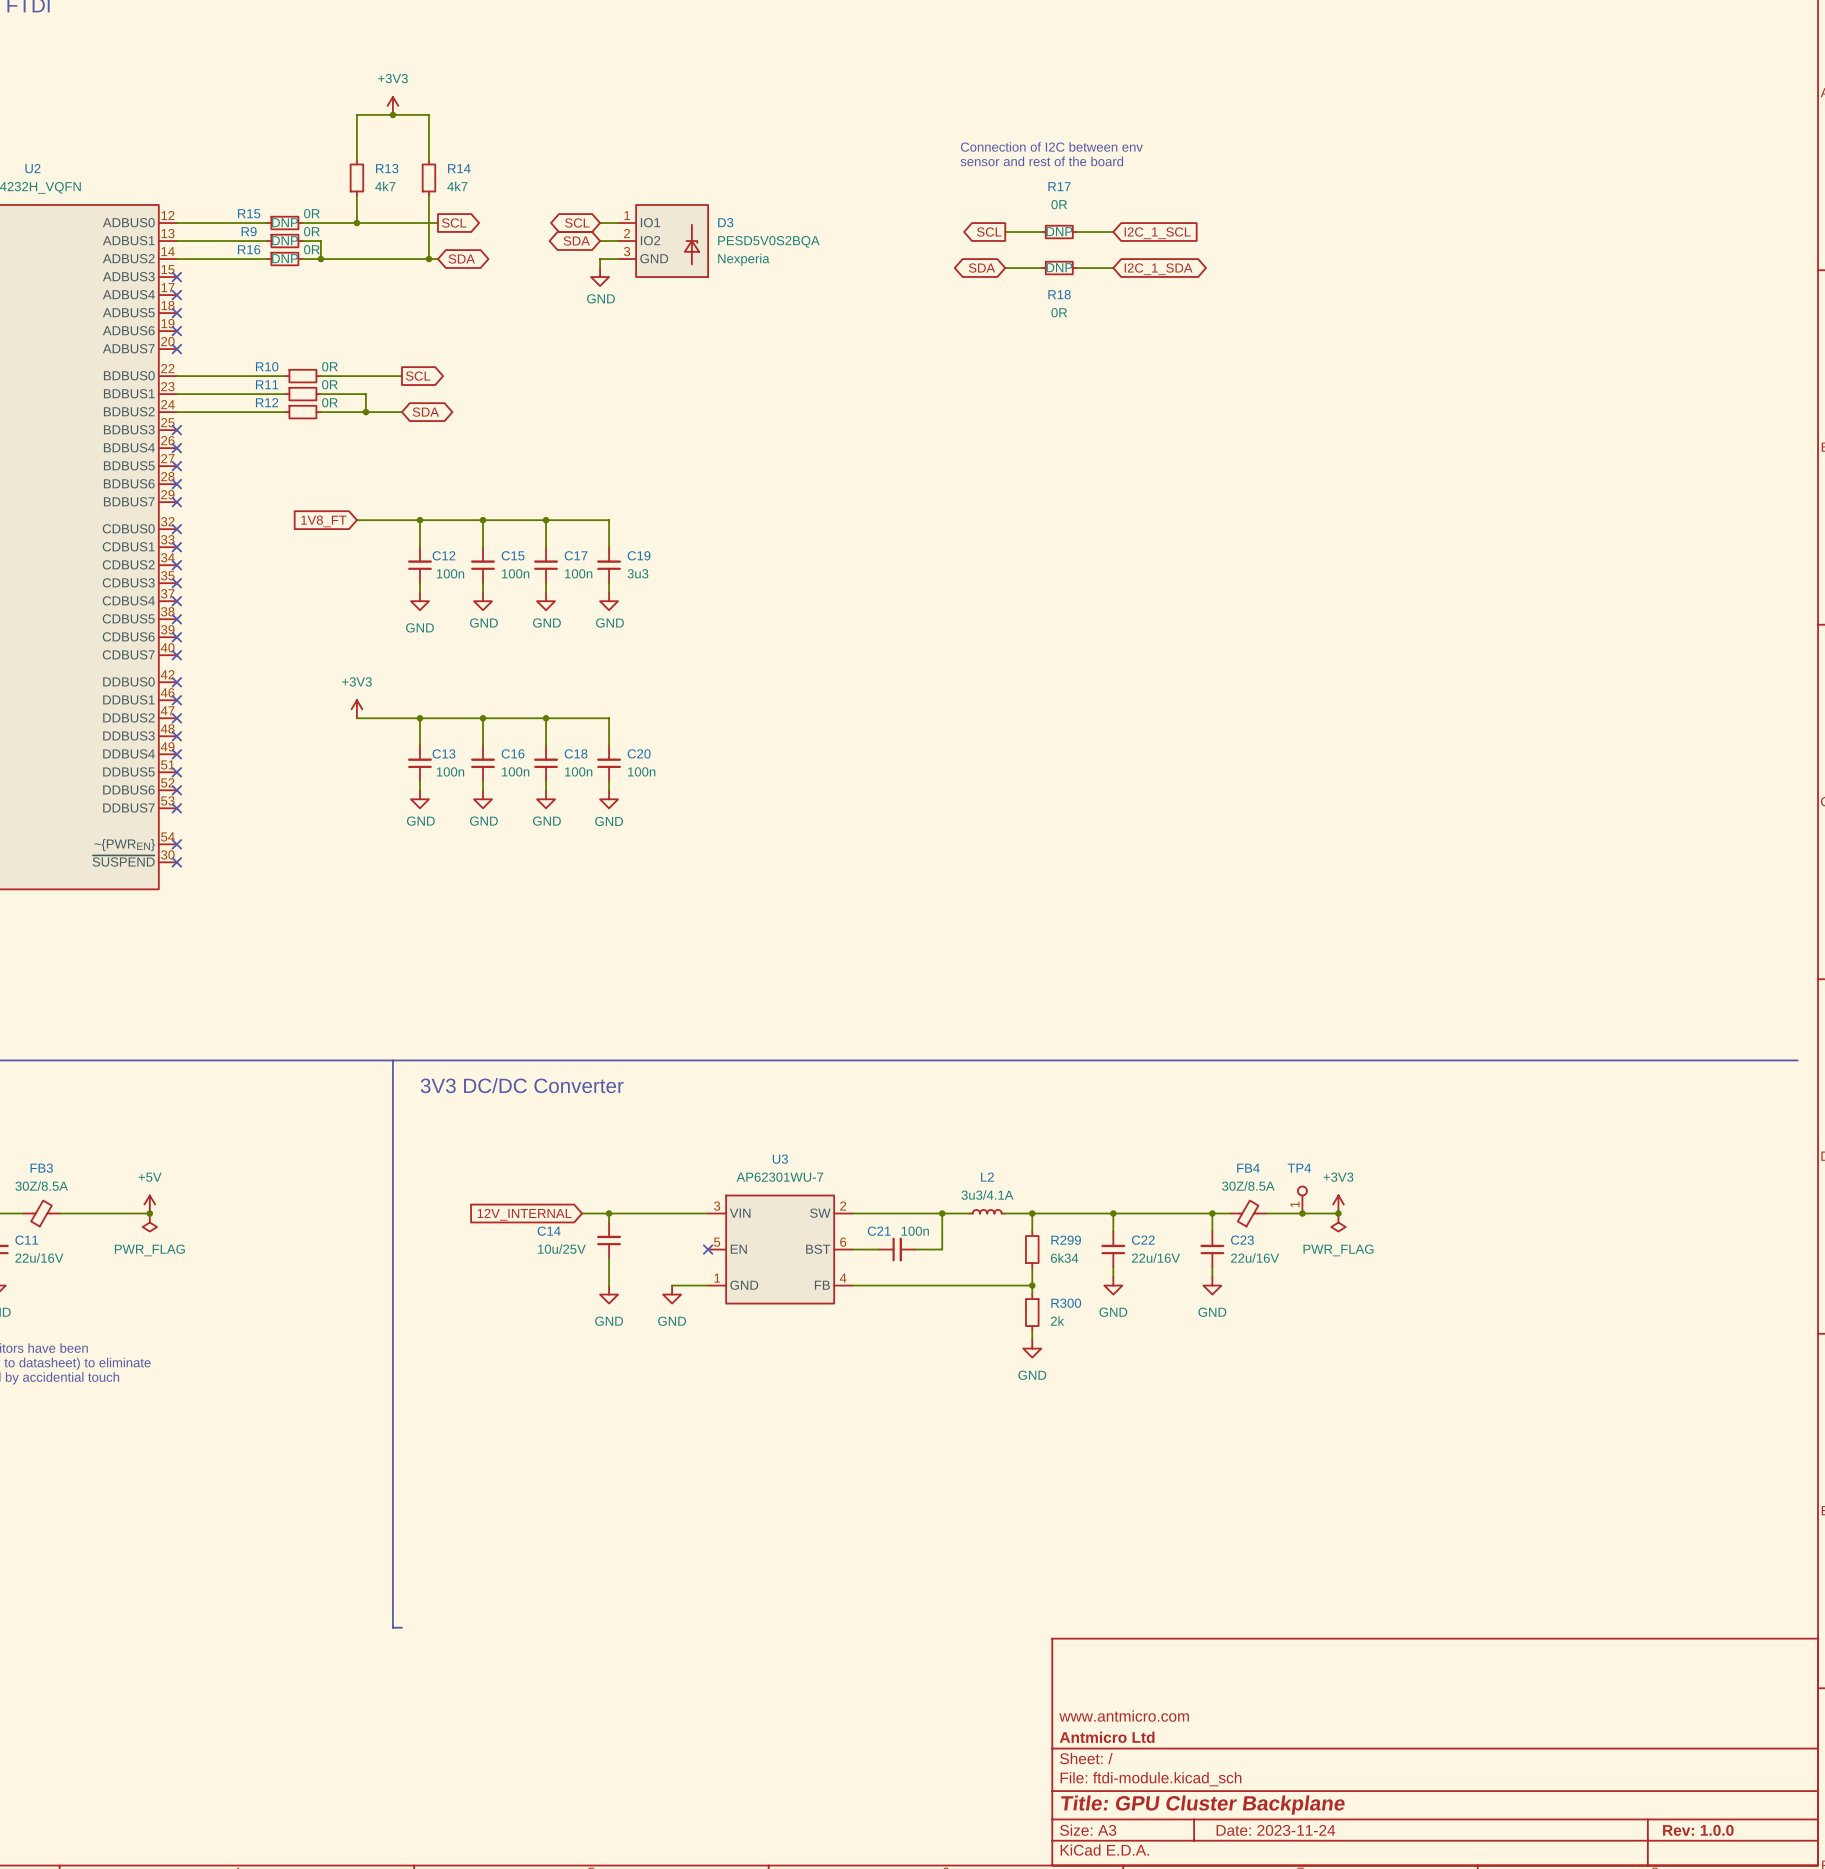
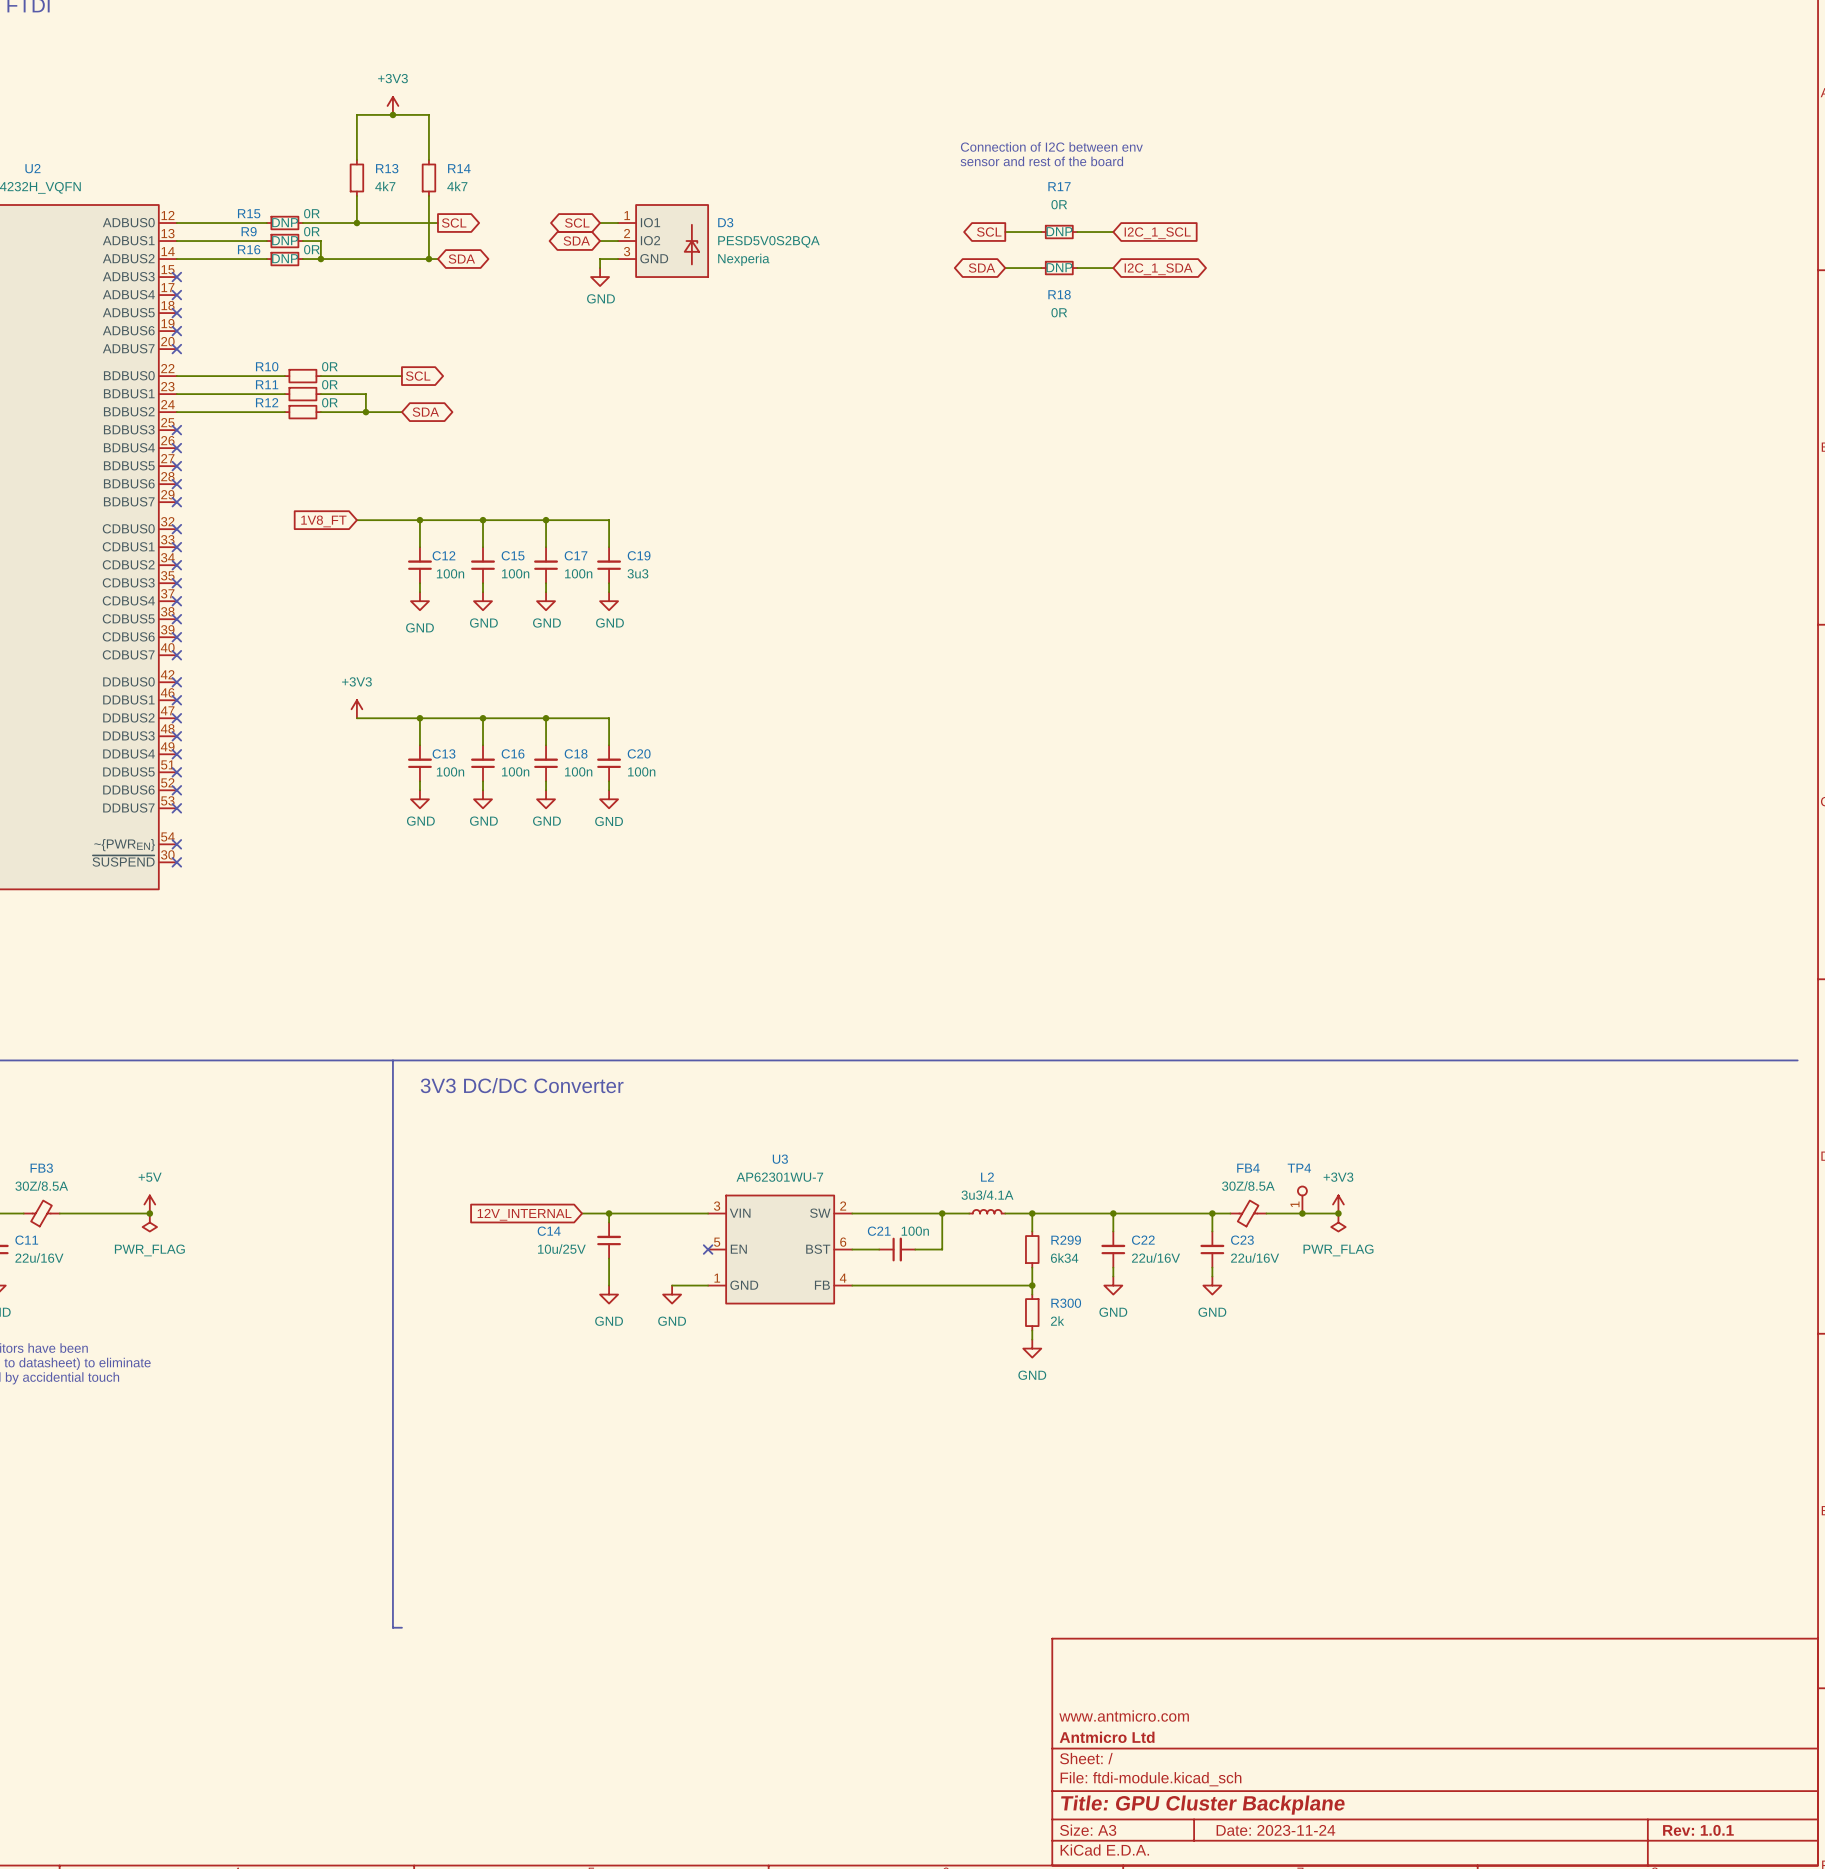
title block: Rev: 1.0.0 (1698, 1830) -> Rev: 1.0.1 (1698, 1830)

